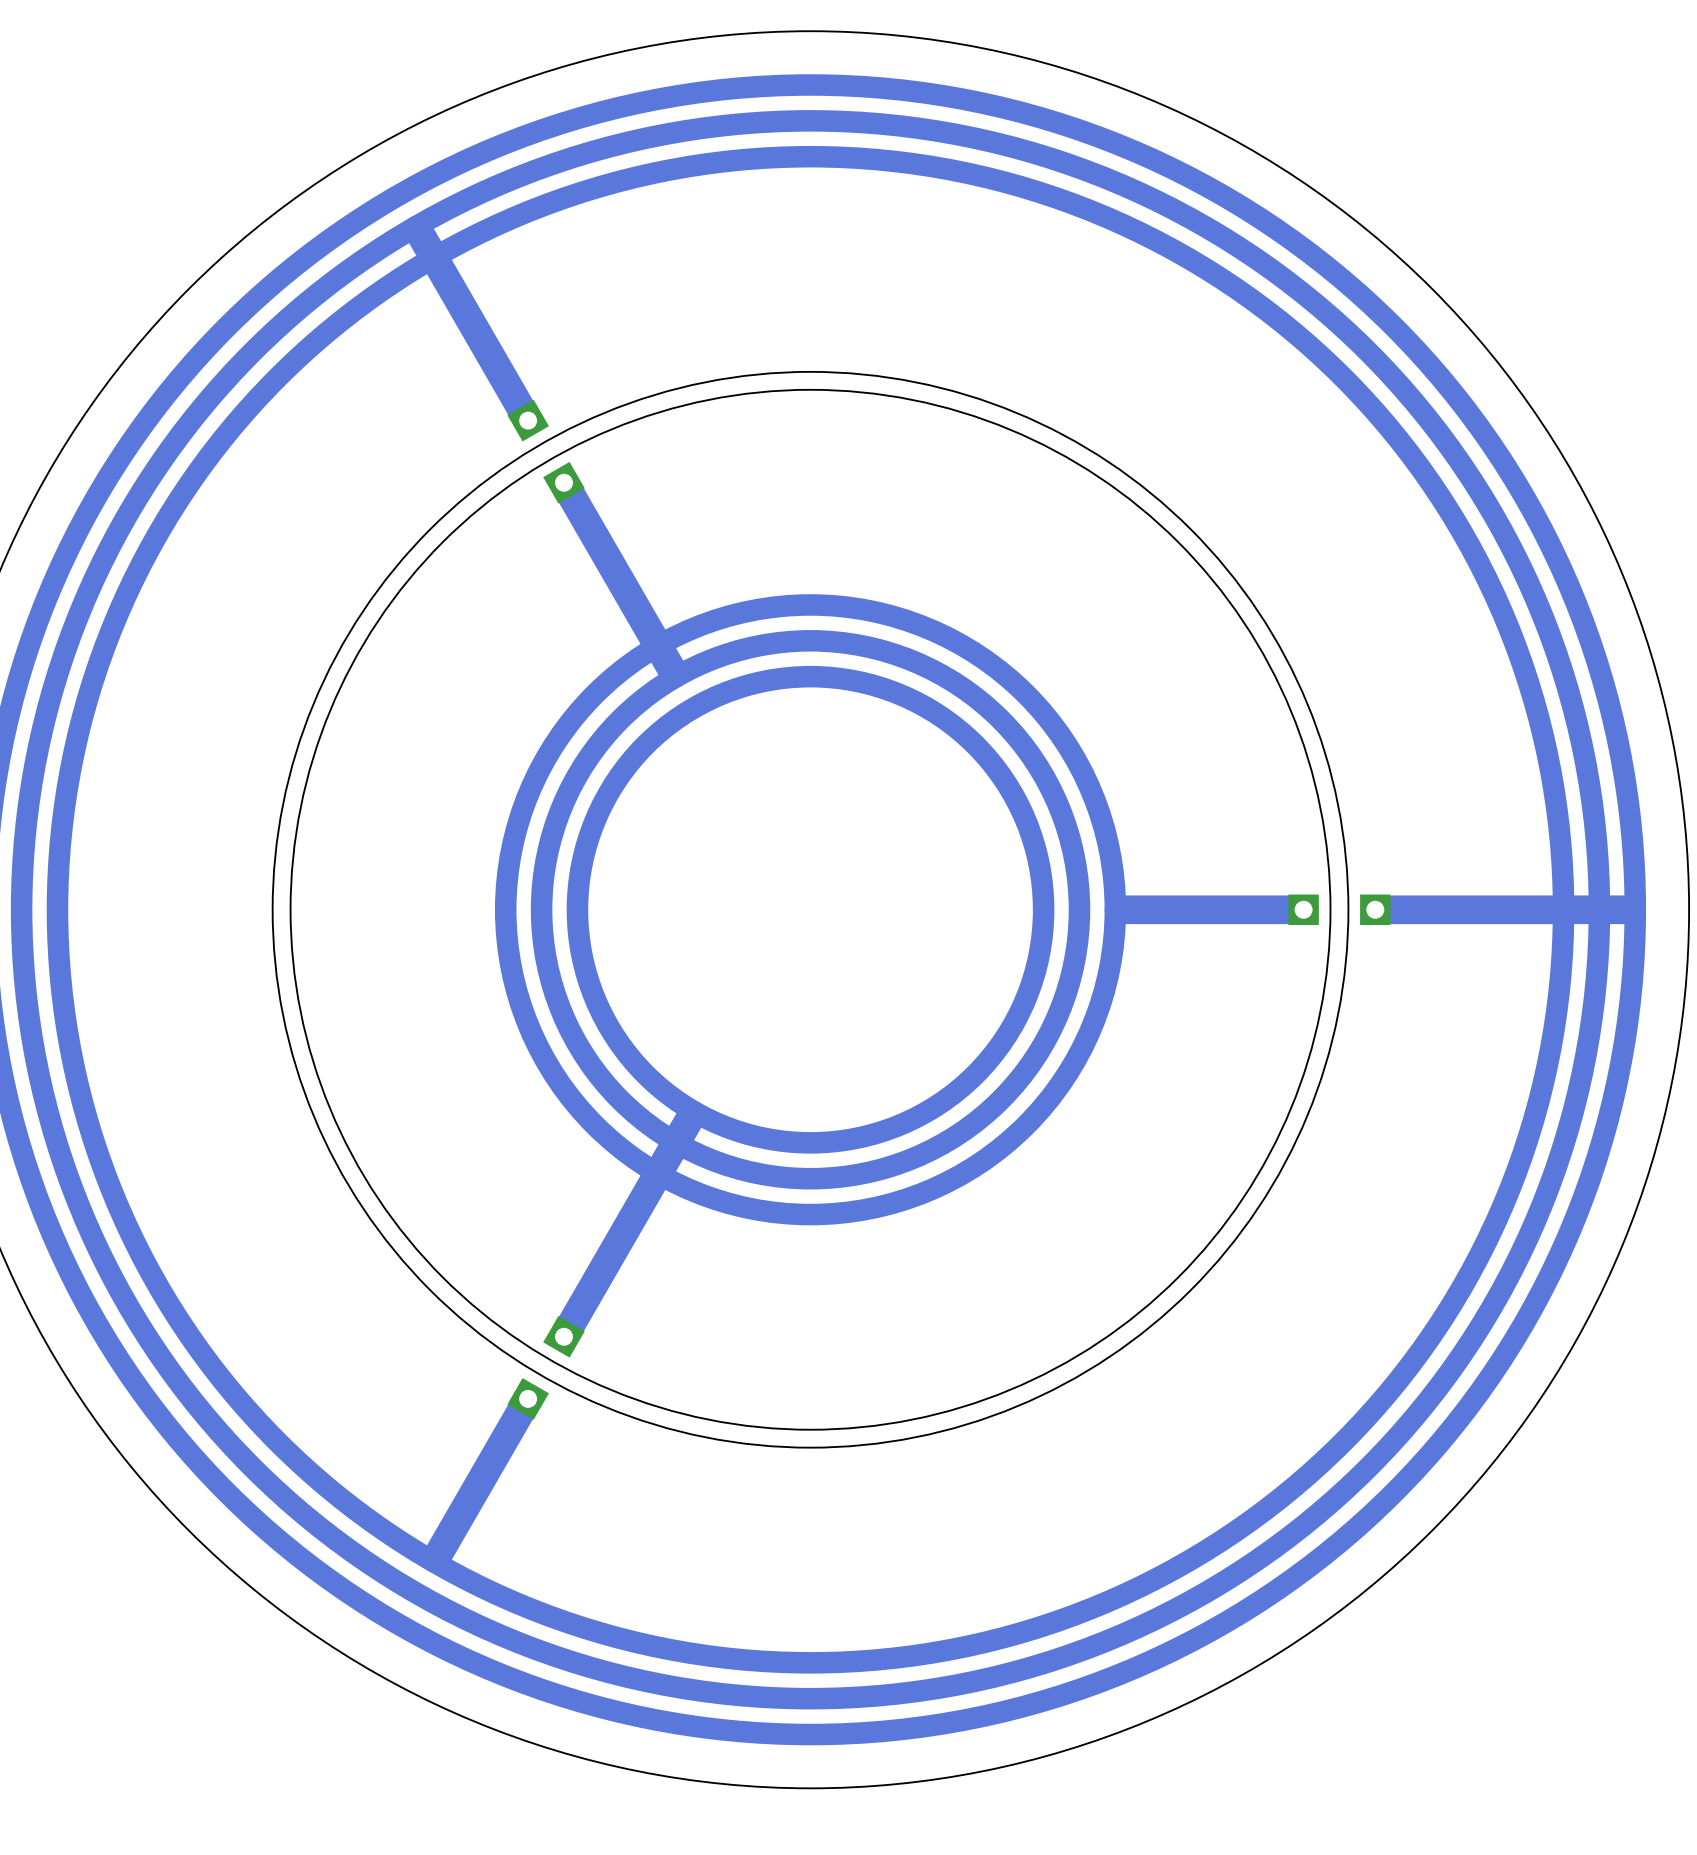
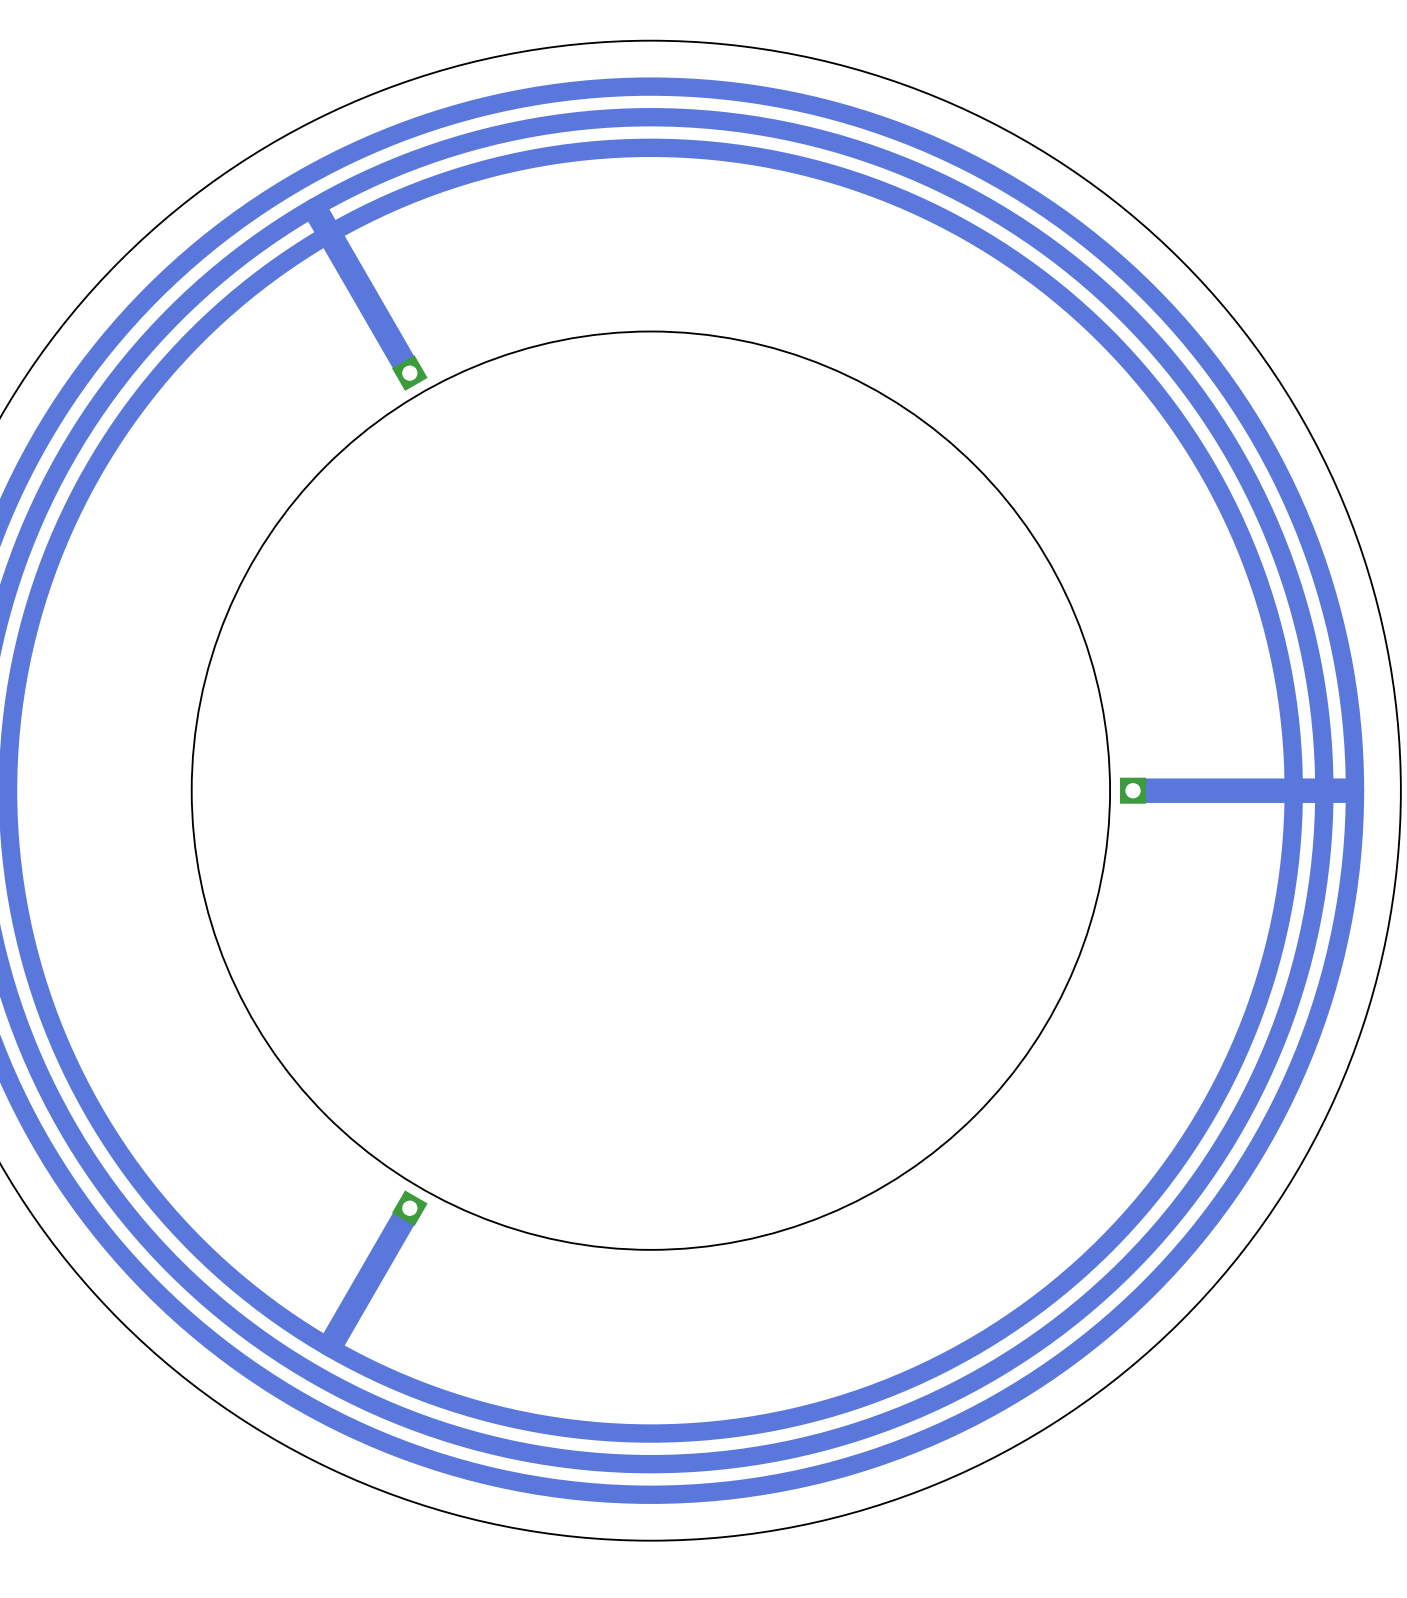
round board edge: [289, 388, 1332, 1431] -> none
bottom track: (564, 482) (674, 673) -> none
part: (564, 482) -> none
drawing: [494, 594, 1127, 1226] -> none
bottom track: (1303, 909) (1118, 909) -> none
part: (1303, 909) -> none
bottom track: (692, 1114) (564, 1336) -> none
part: (564, 1336) -> none

